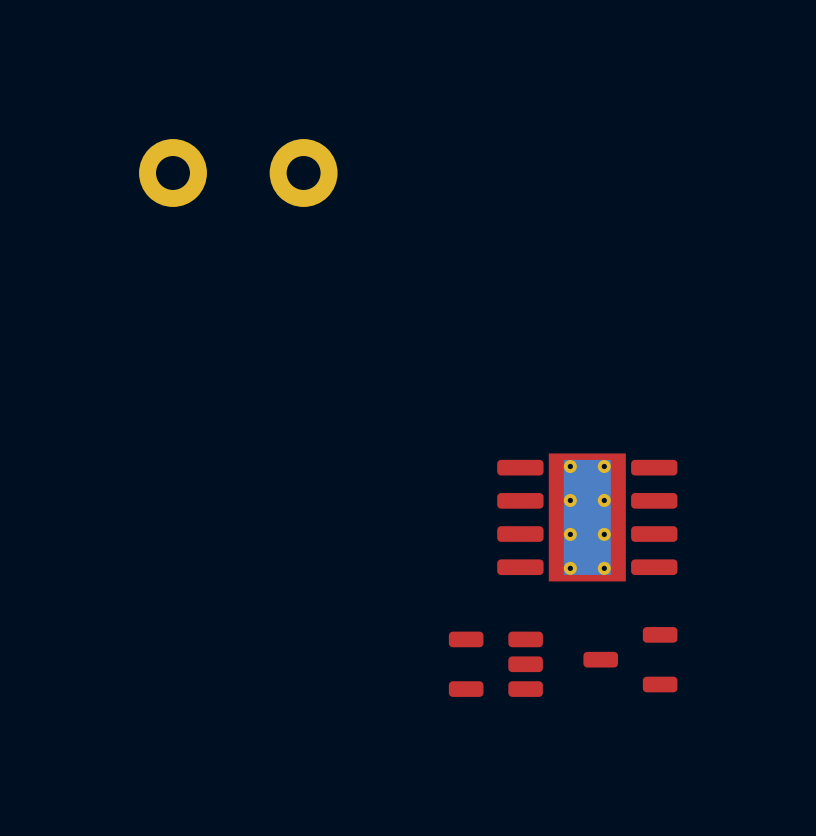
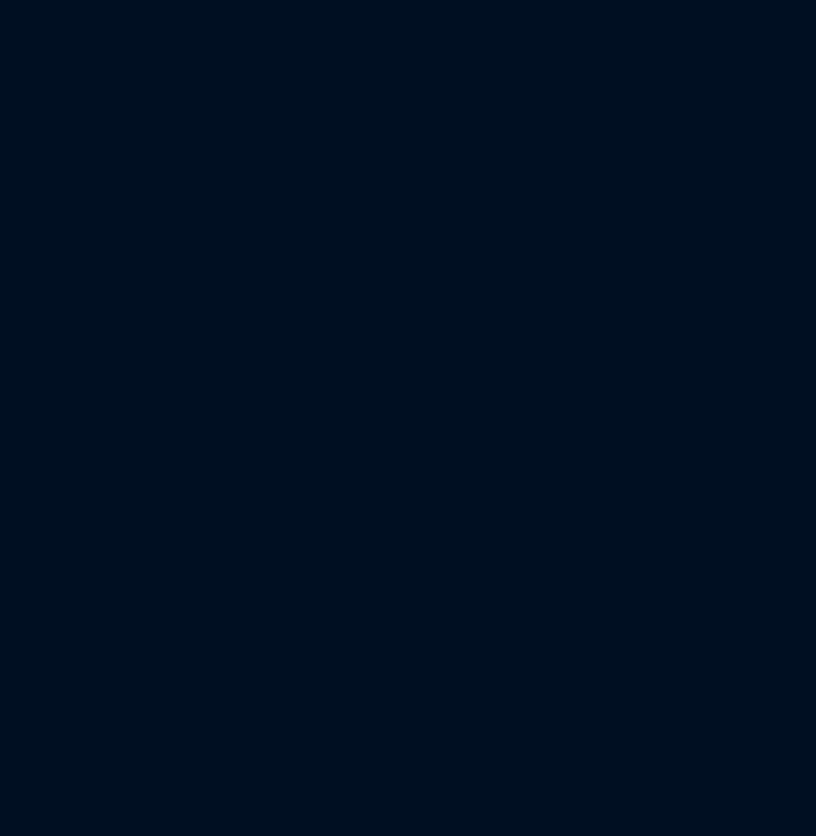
part: (238, 172) -> none
part: (587, 517) -> none
part: (630, 659) -> none
part: (495, 664) -> none

